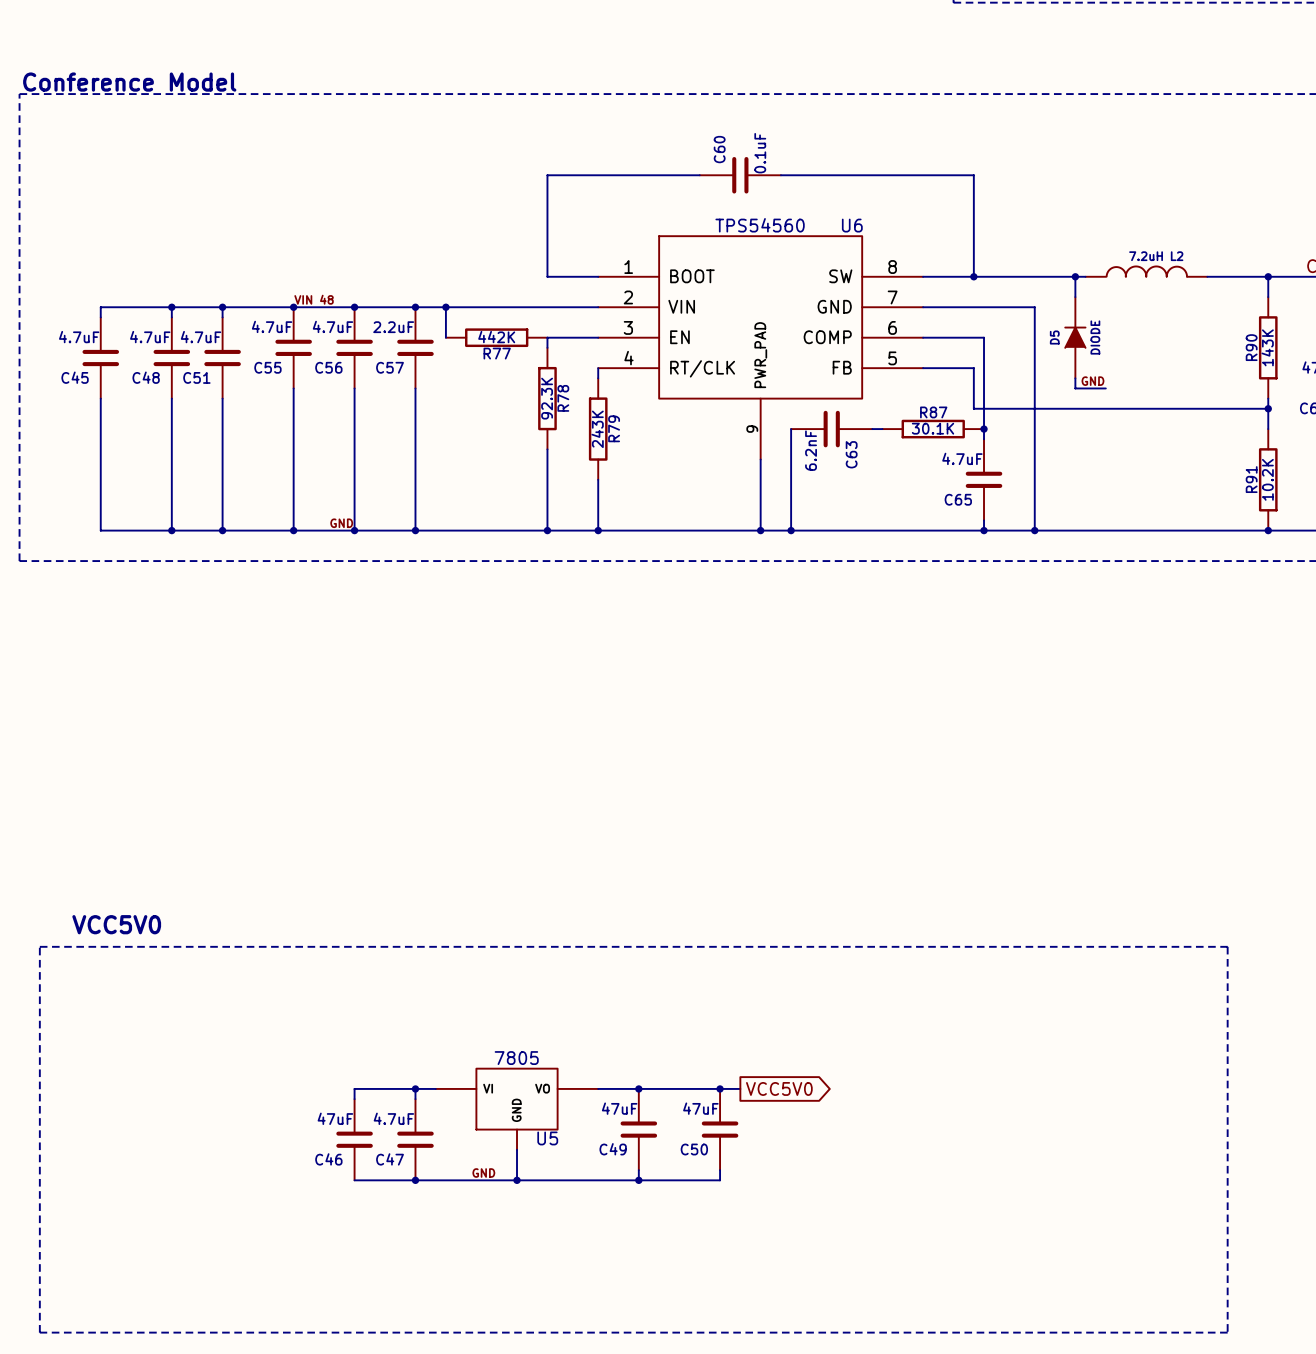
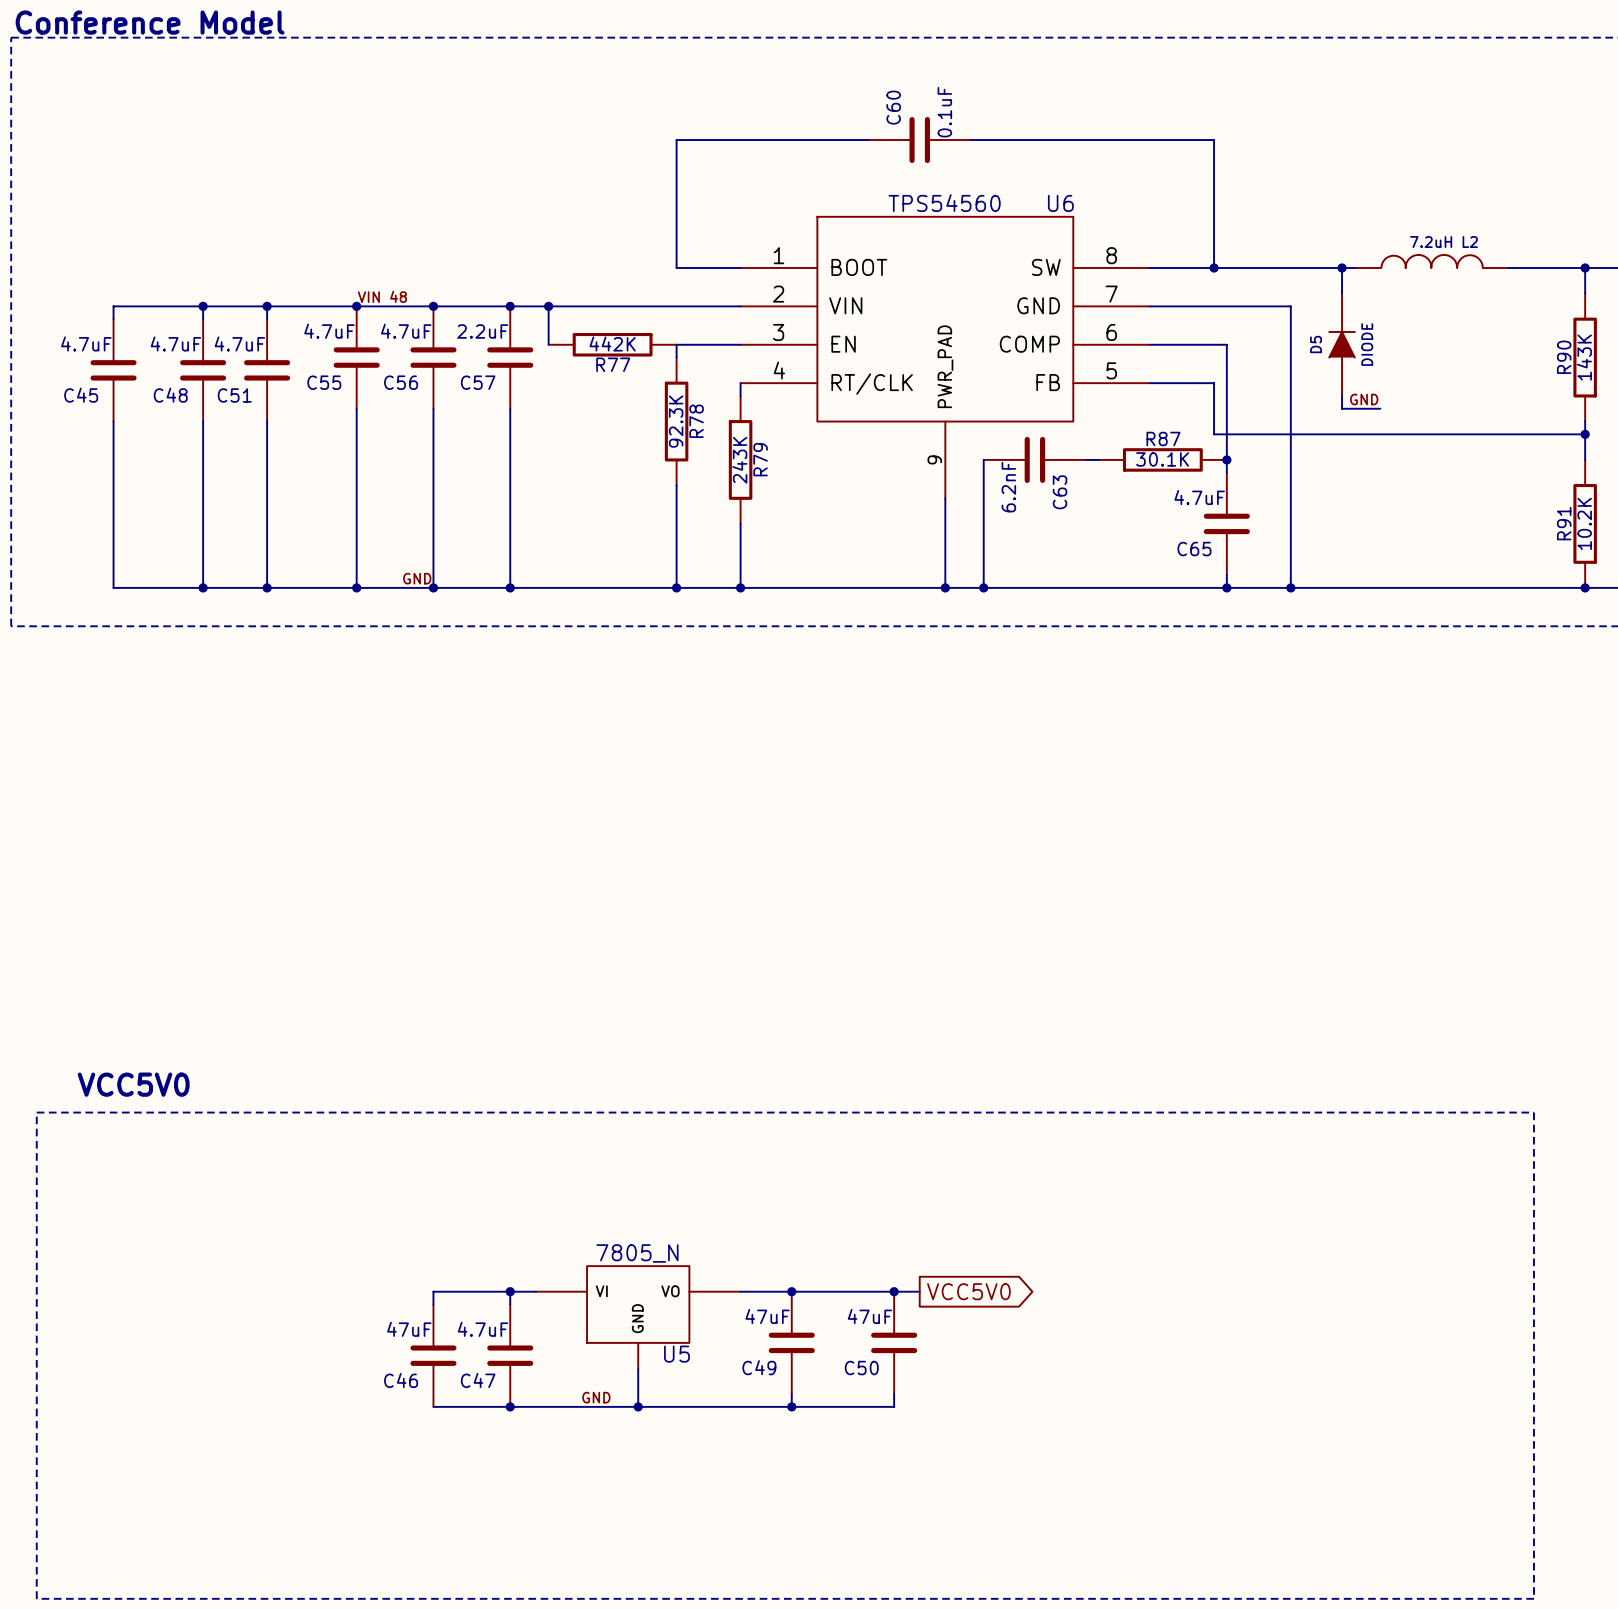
U5 value: 7805 (516, 1058) -> 7805_N (637, 1253)

